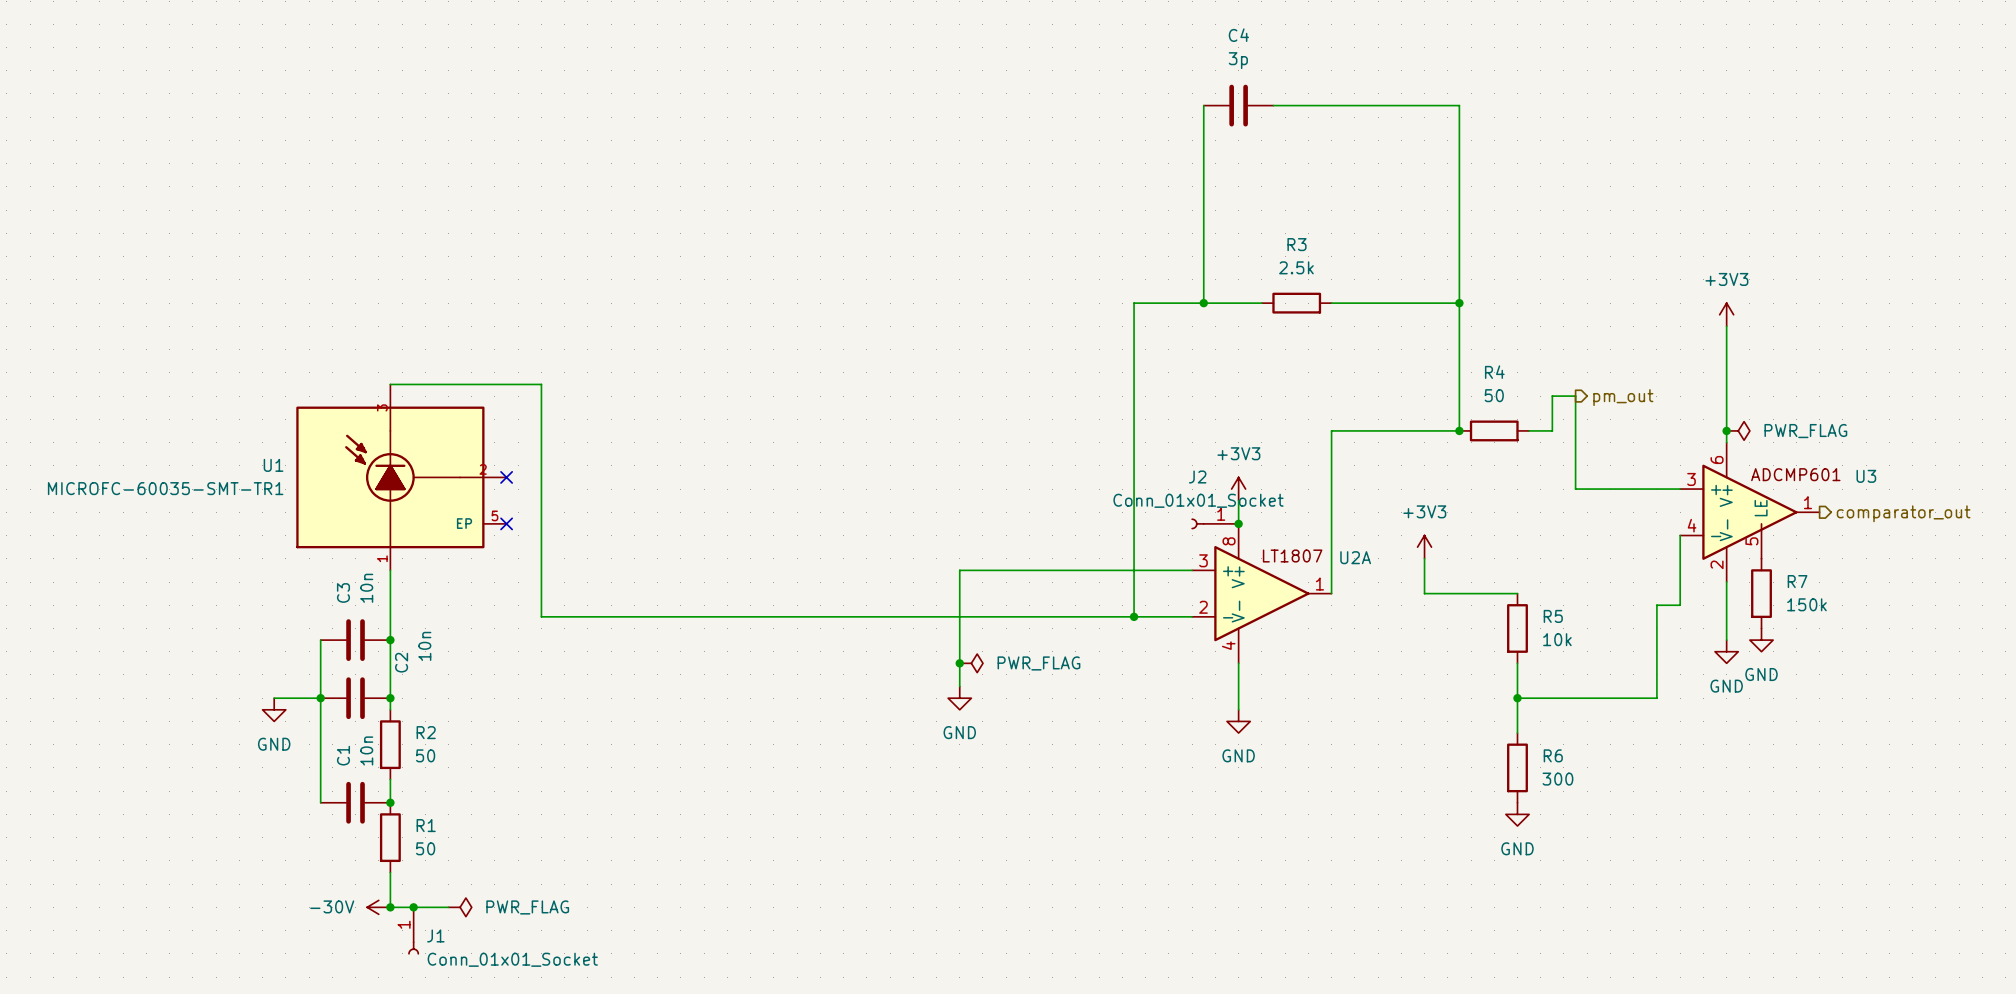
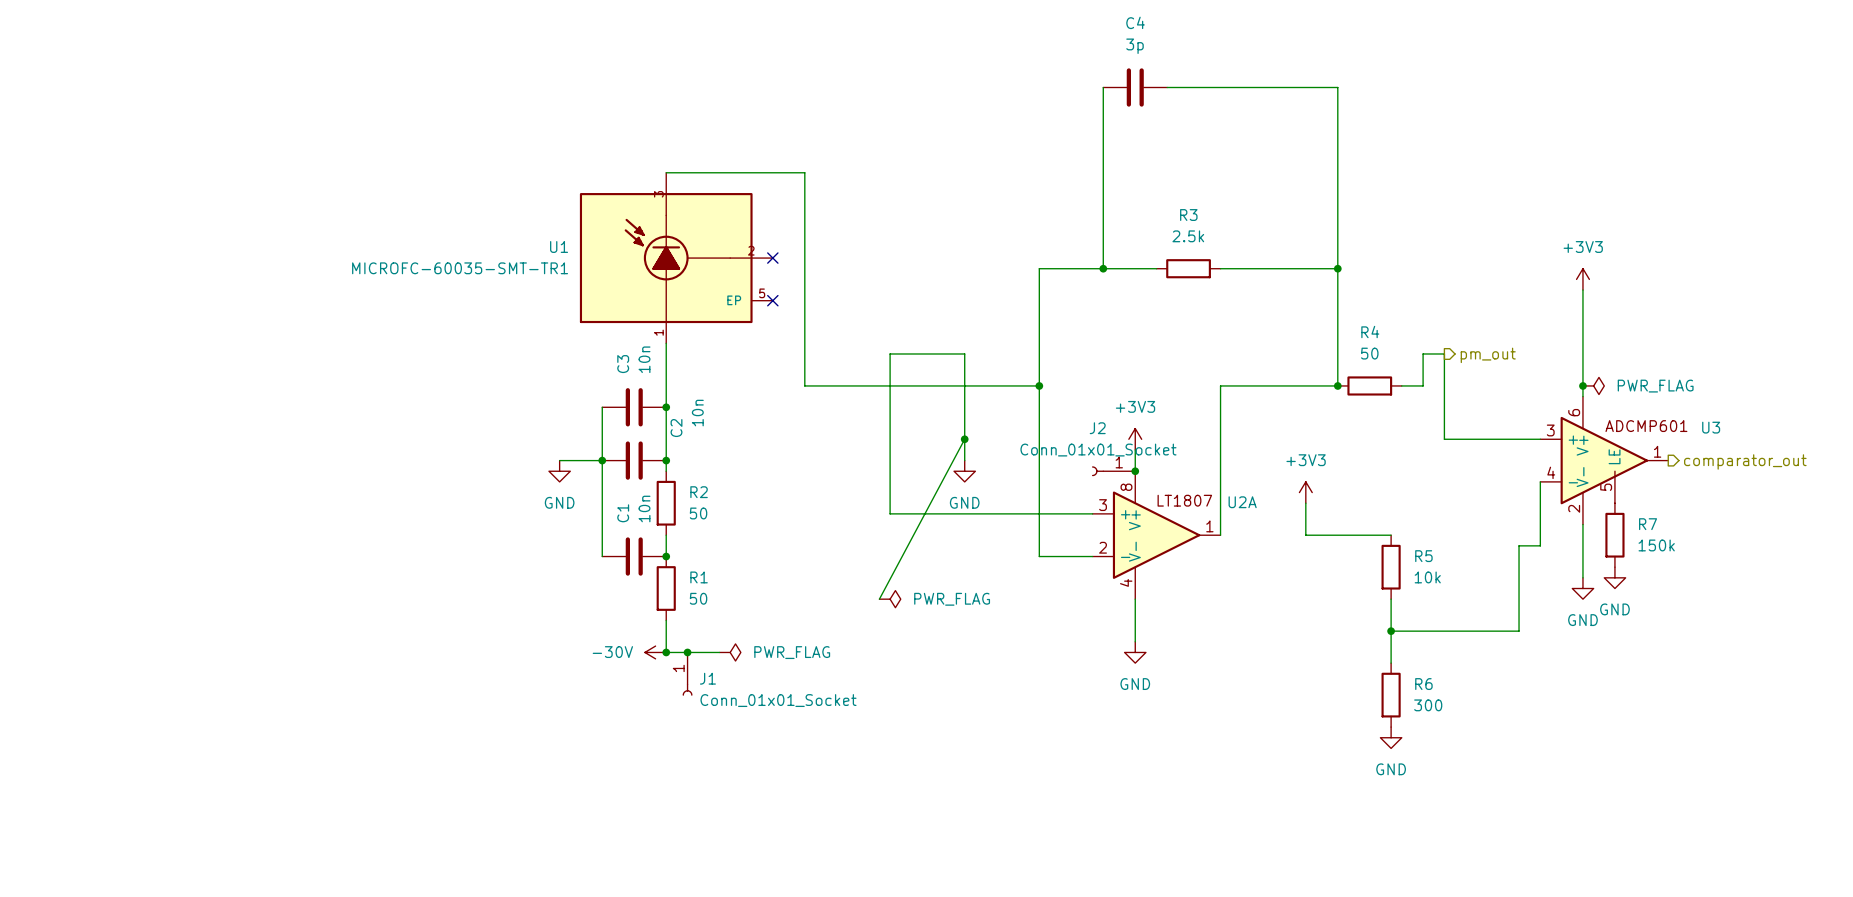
wire: none -> (666, 172) (804, 172) (804, 385) (1039, 385)
no-connect mark: none -> (772, 258)
no-connect mark: none -> (772, 300)
wire: (390, 384) (541, 384) (541, 616) (1134, 616) -> none
wire: none -> (666, 343) (666, 471)
junction: none -> (1039, 385)
wire: none -> (602, 407) (602, 556)
junction: none -> (666, 407)
U1 position: (401, 477) -> (676, 258)
no-connect mark: (506, 477) -> none
wire: none -> (964, 439) (879, 599)
junction: none -> (964, 439)
wire: none -> (559, 460) (602, 460)
junction: none -> (602, 460)
junction: none -> (666, 460)
no-connect mark: (506, 523) -> none
power symbol: none -> GND (559, 471)
power symbol: none -> GND (964, 471)
wire: (390, 570) (390, 709) -> none
wire: (971, 570) (959, 570) (959, 686) -> (890, 513) (890, 353) (964, 353) (964, 460)
wire: none -> (666, 535) (666, 556)
junction: none -> (666, 556)
junction: (1134, 616) -> none
wire: (320, 640) (320, 802) -> none
C3 position: (355, 640) -> (634, 407)
junction: (390, 640) -> none
junction: (959, 663) -> none
wire: none -> (666, 620) (666, 652) (719, 652)
wire: (274, 698) (320, 698) -> none
junction: (320, 698) -> none
C2 position: (355, 698) -> (634, 460)
junction: (390, 698) -> none
power symbol: GND (959, 698) -> none
power symbol: GND (274, 709) -> none
power symbol: none -> -30V (655, 652)
junction: none -> (666, 652)
junction: none -> (687, 652)
power symbol: none -> PWR_FLAG (730, 652)
R2 position: (390, 744) -> (666, 503)
wire: (390, 779) (390, 802) -> none
C1 position: (355, 802) -> (634, 556)
junction: (390, 802) -> none
R1 position: (390, 837) -> (666, 588)
wire: (390, 872) (390, 907) (448, 907) -> none
power symbol: -30V (378, 907) -> none
junction: (390, 907) -> none
junction: (413, 907) -> none
power symbol: PWR_FLAG (460, 907) -> none
J1 position: (413, 930) -> (687, 674)

